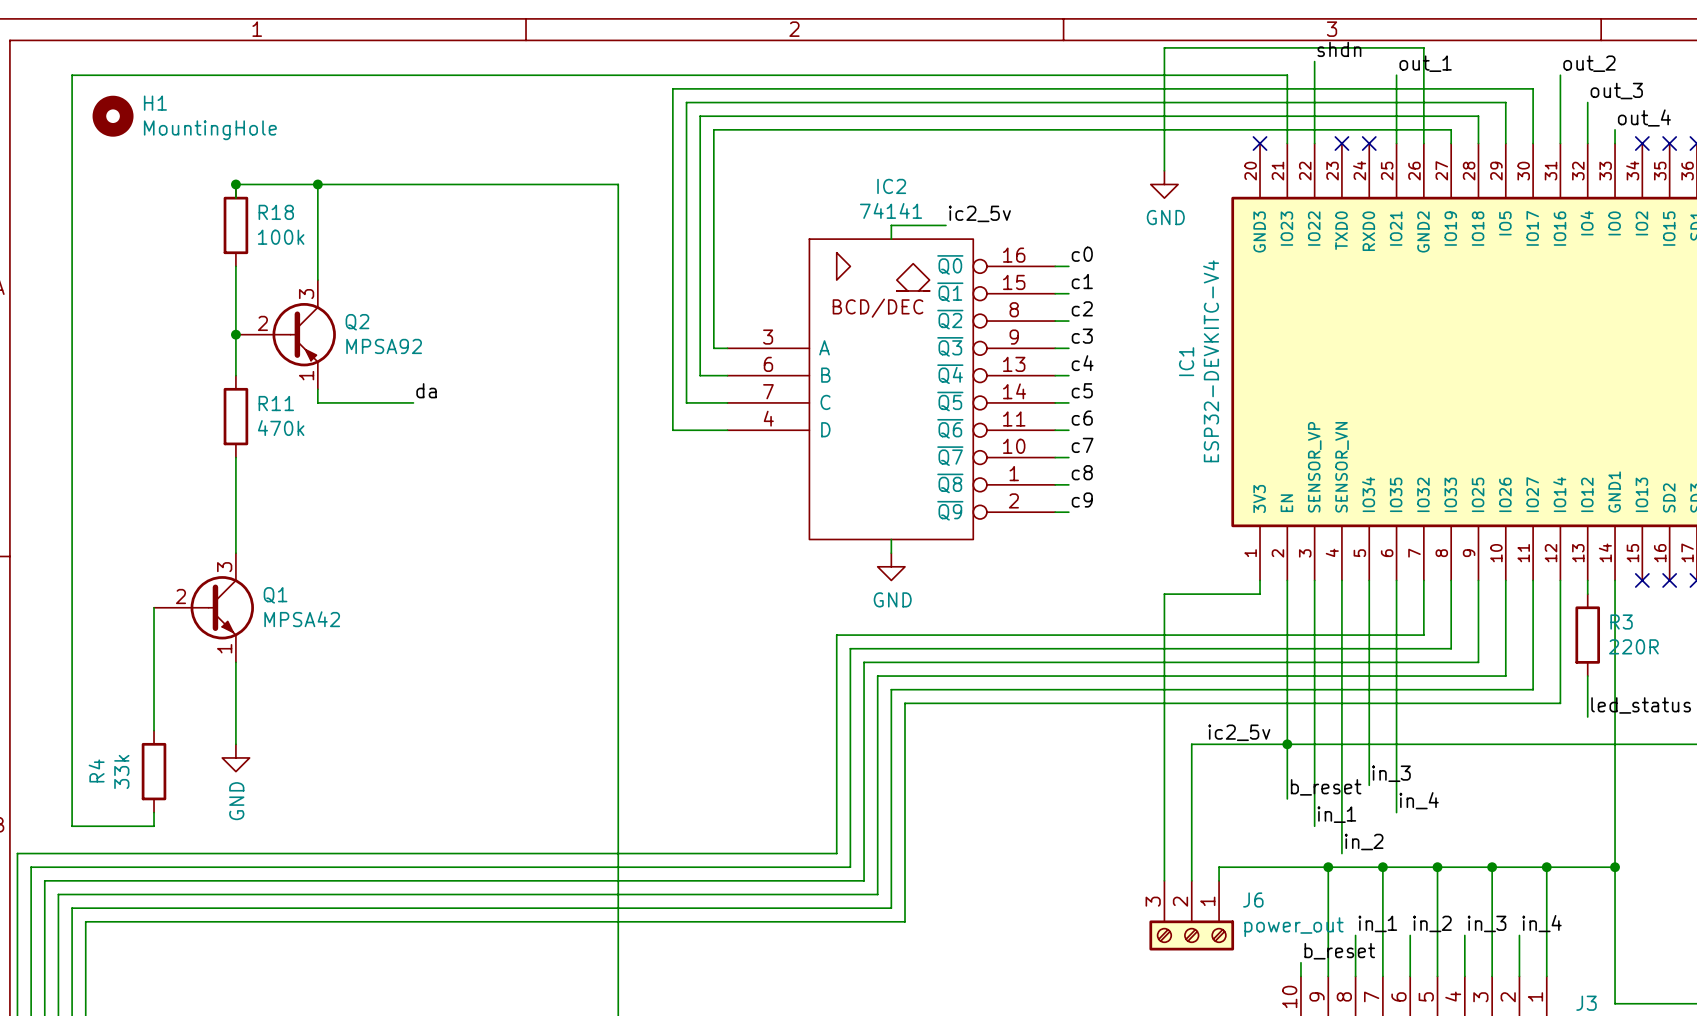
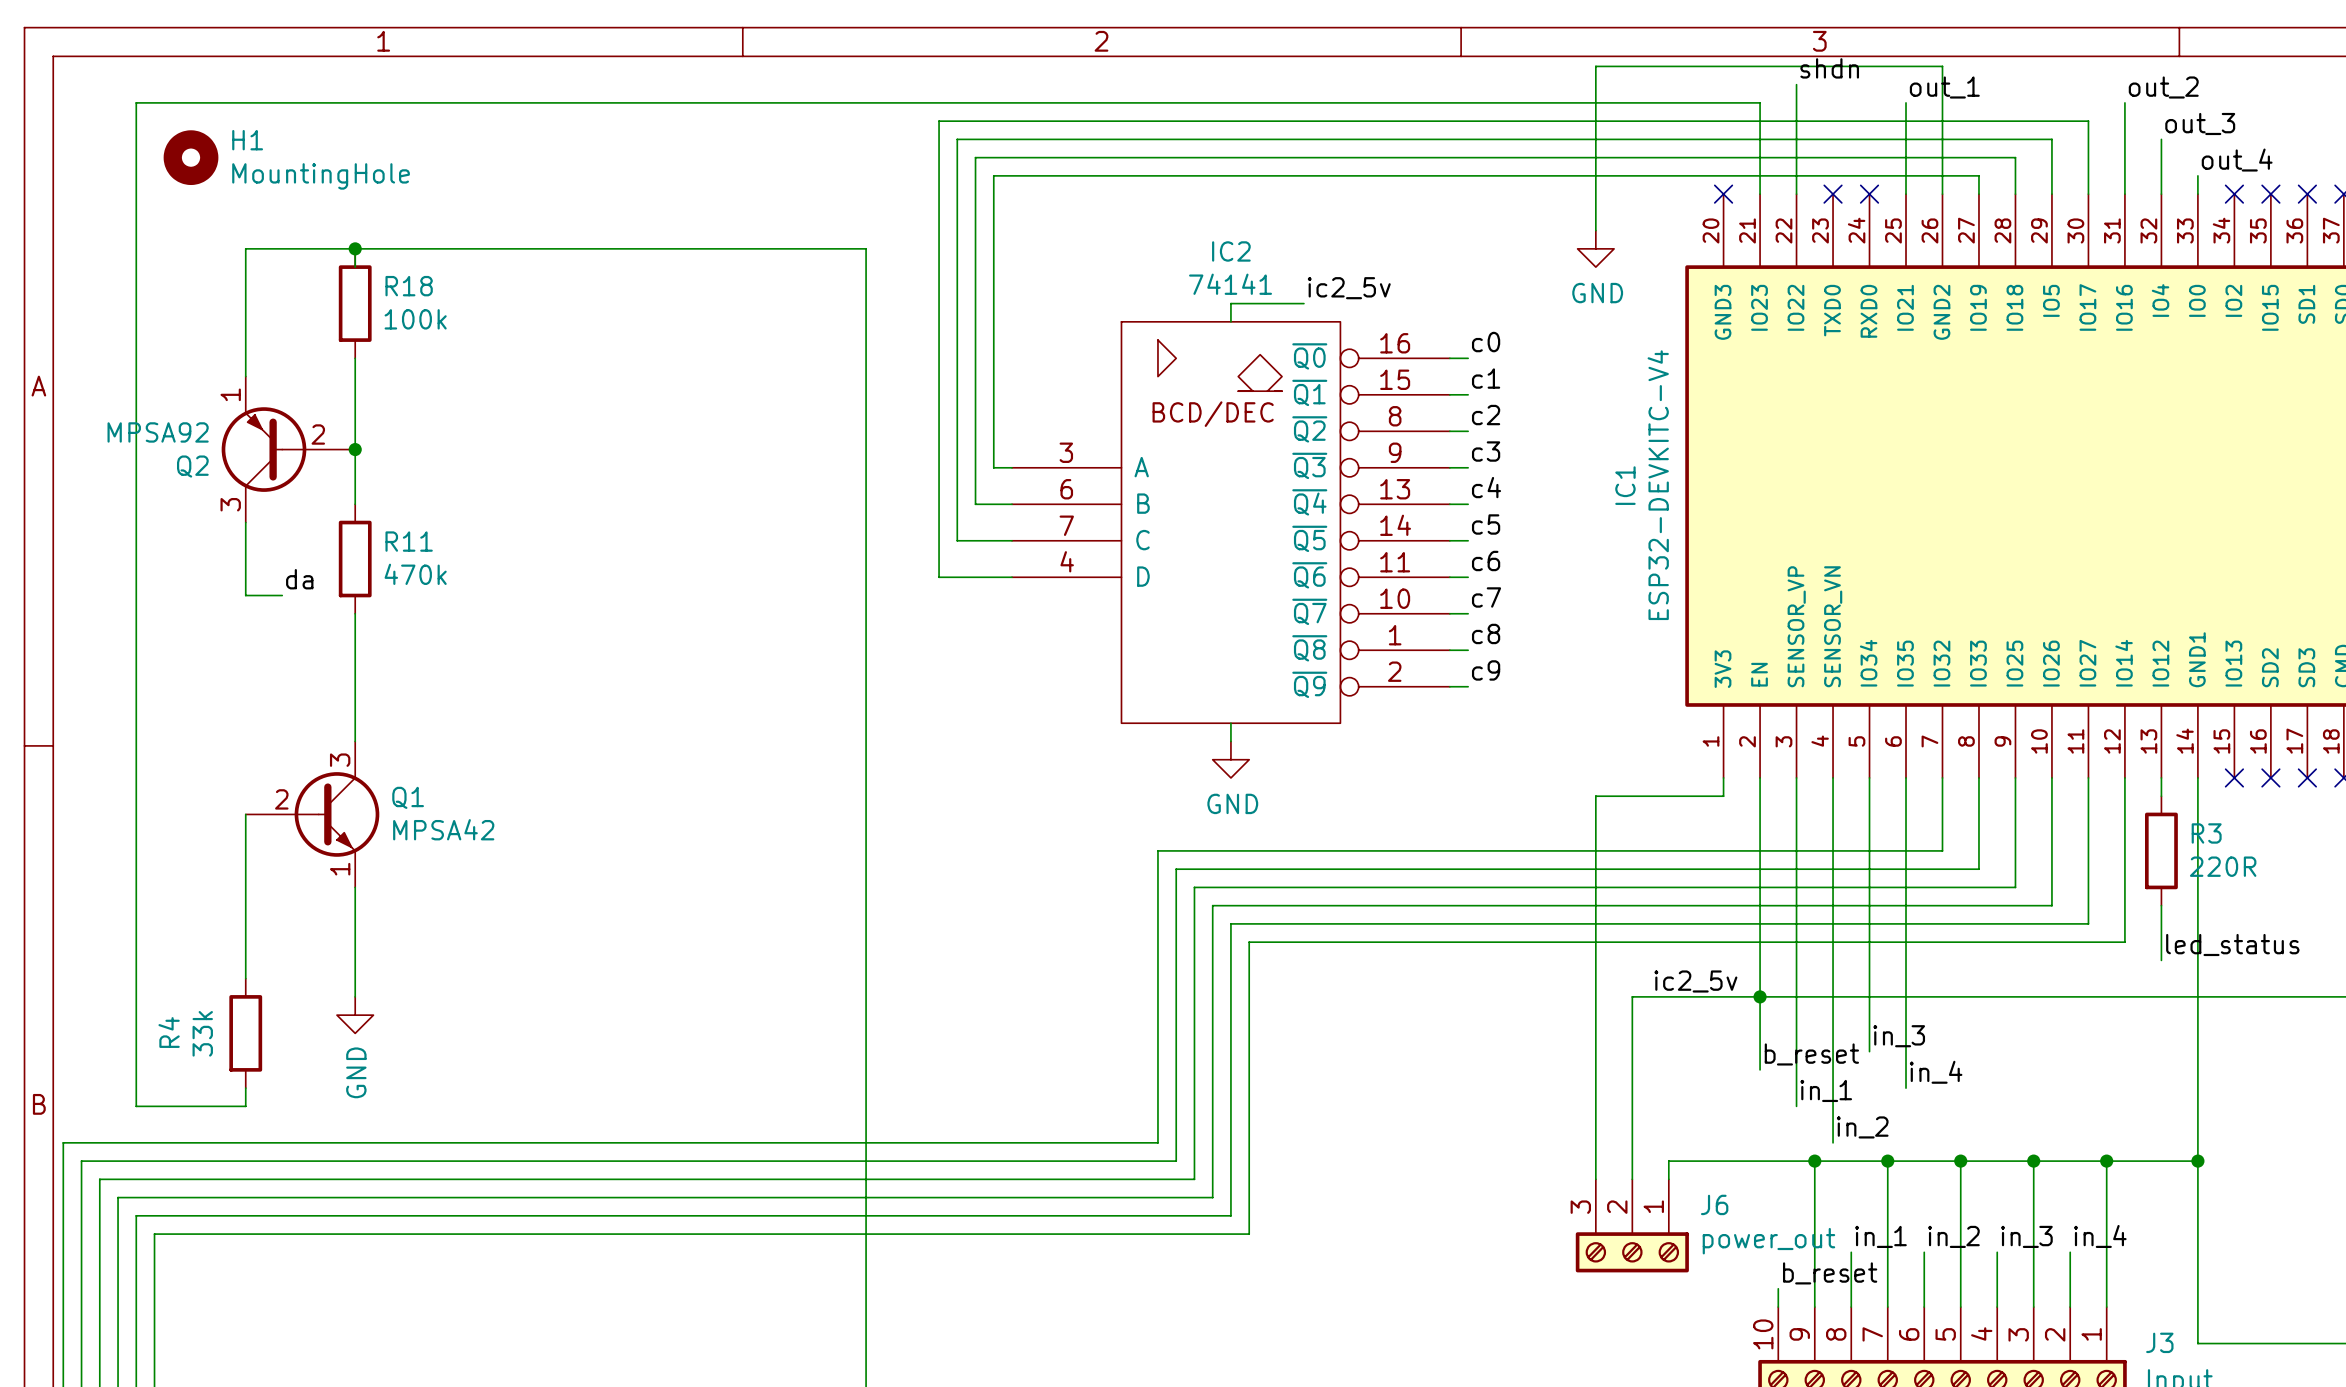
wire: none -> (355, 248) (245, 248) (245, 376)
wire: (317, 184) (317, 280) -> none
junction: (317, 184) -> none
Q2 position: (285, 334) -> (288, 449)
Q2 rotation: 0° (304, 334) -> 180° (263, 449)
wire: none -> (245, 522) (245, 595) (282, 595)
wire: (317, 389) (317, 402) (413, 402) -> none
label position: da (426, 390) -> da (299, 579)

